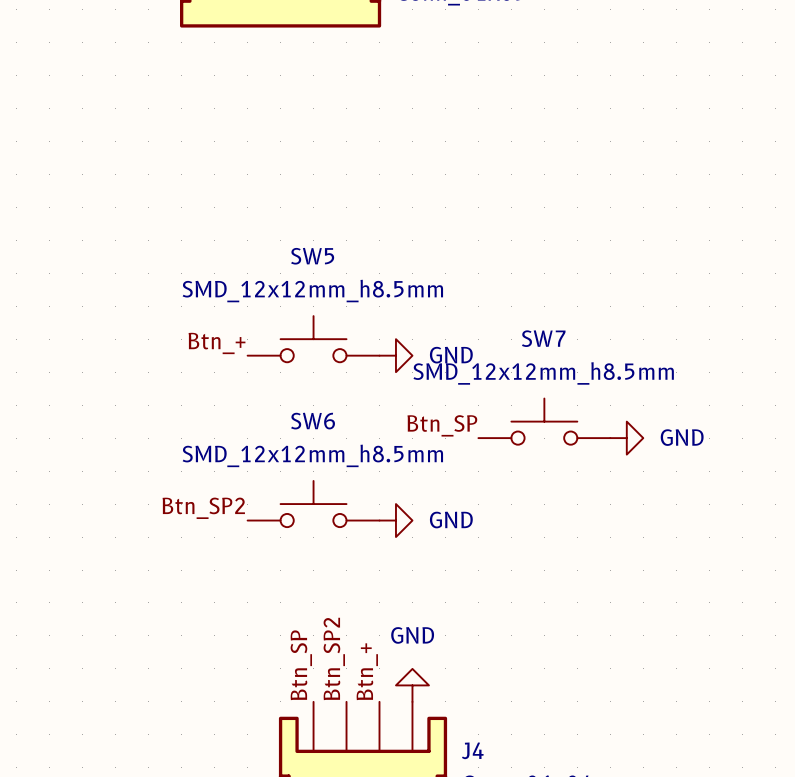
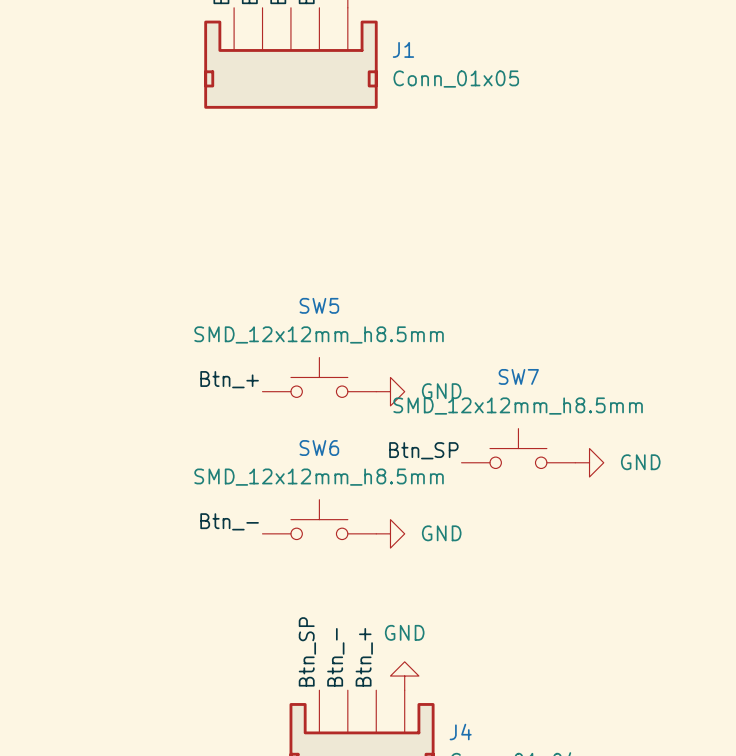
label: Btn_SP2 (203, 508) -> Btn_- (229, 521)
label: Btn_SP2 (334, 658) -> Btn_- (335, 657)

